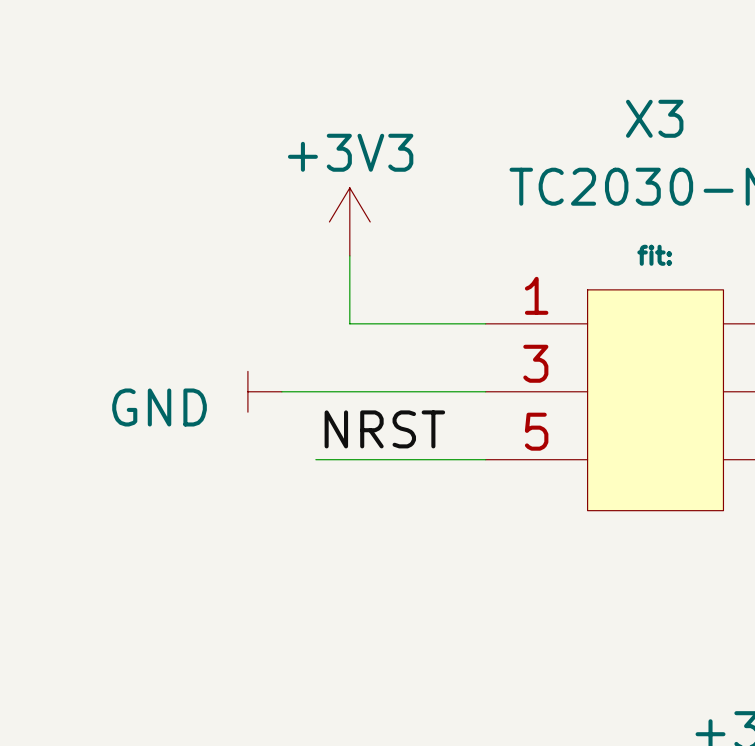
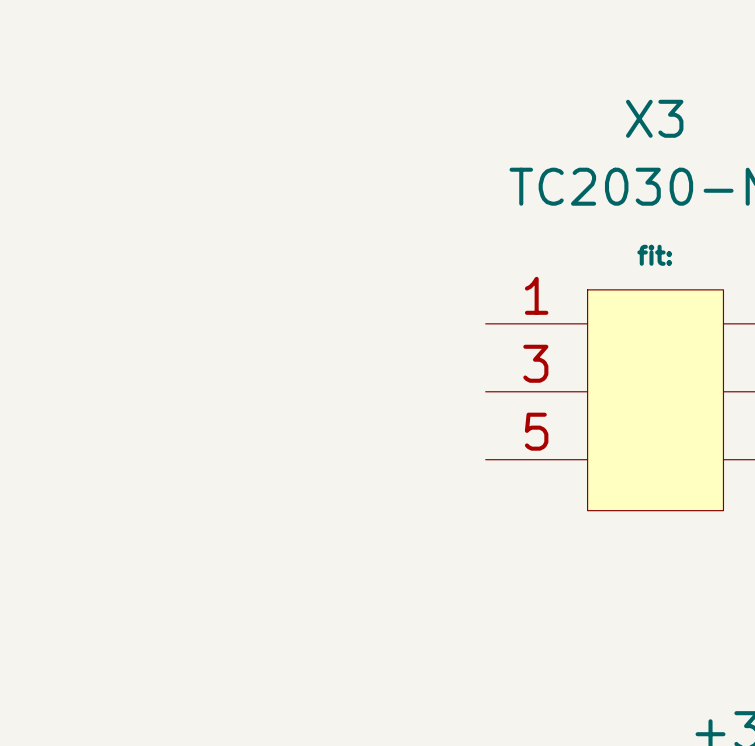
power symbol: +3V3 (349, 221) -> none
wire: (349, 255) (349, 323) (485, 323) -> none
power symbol: GND (264, 391) -> none
wire: (281, 391) (485, 391) -> none
label: NRST (384, 429) -> none
wire: (315, 459) (485, 459) -> none

